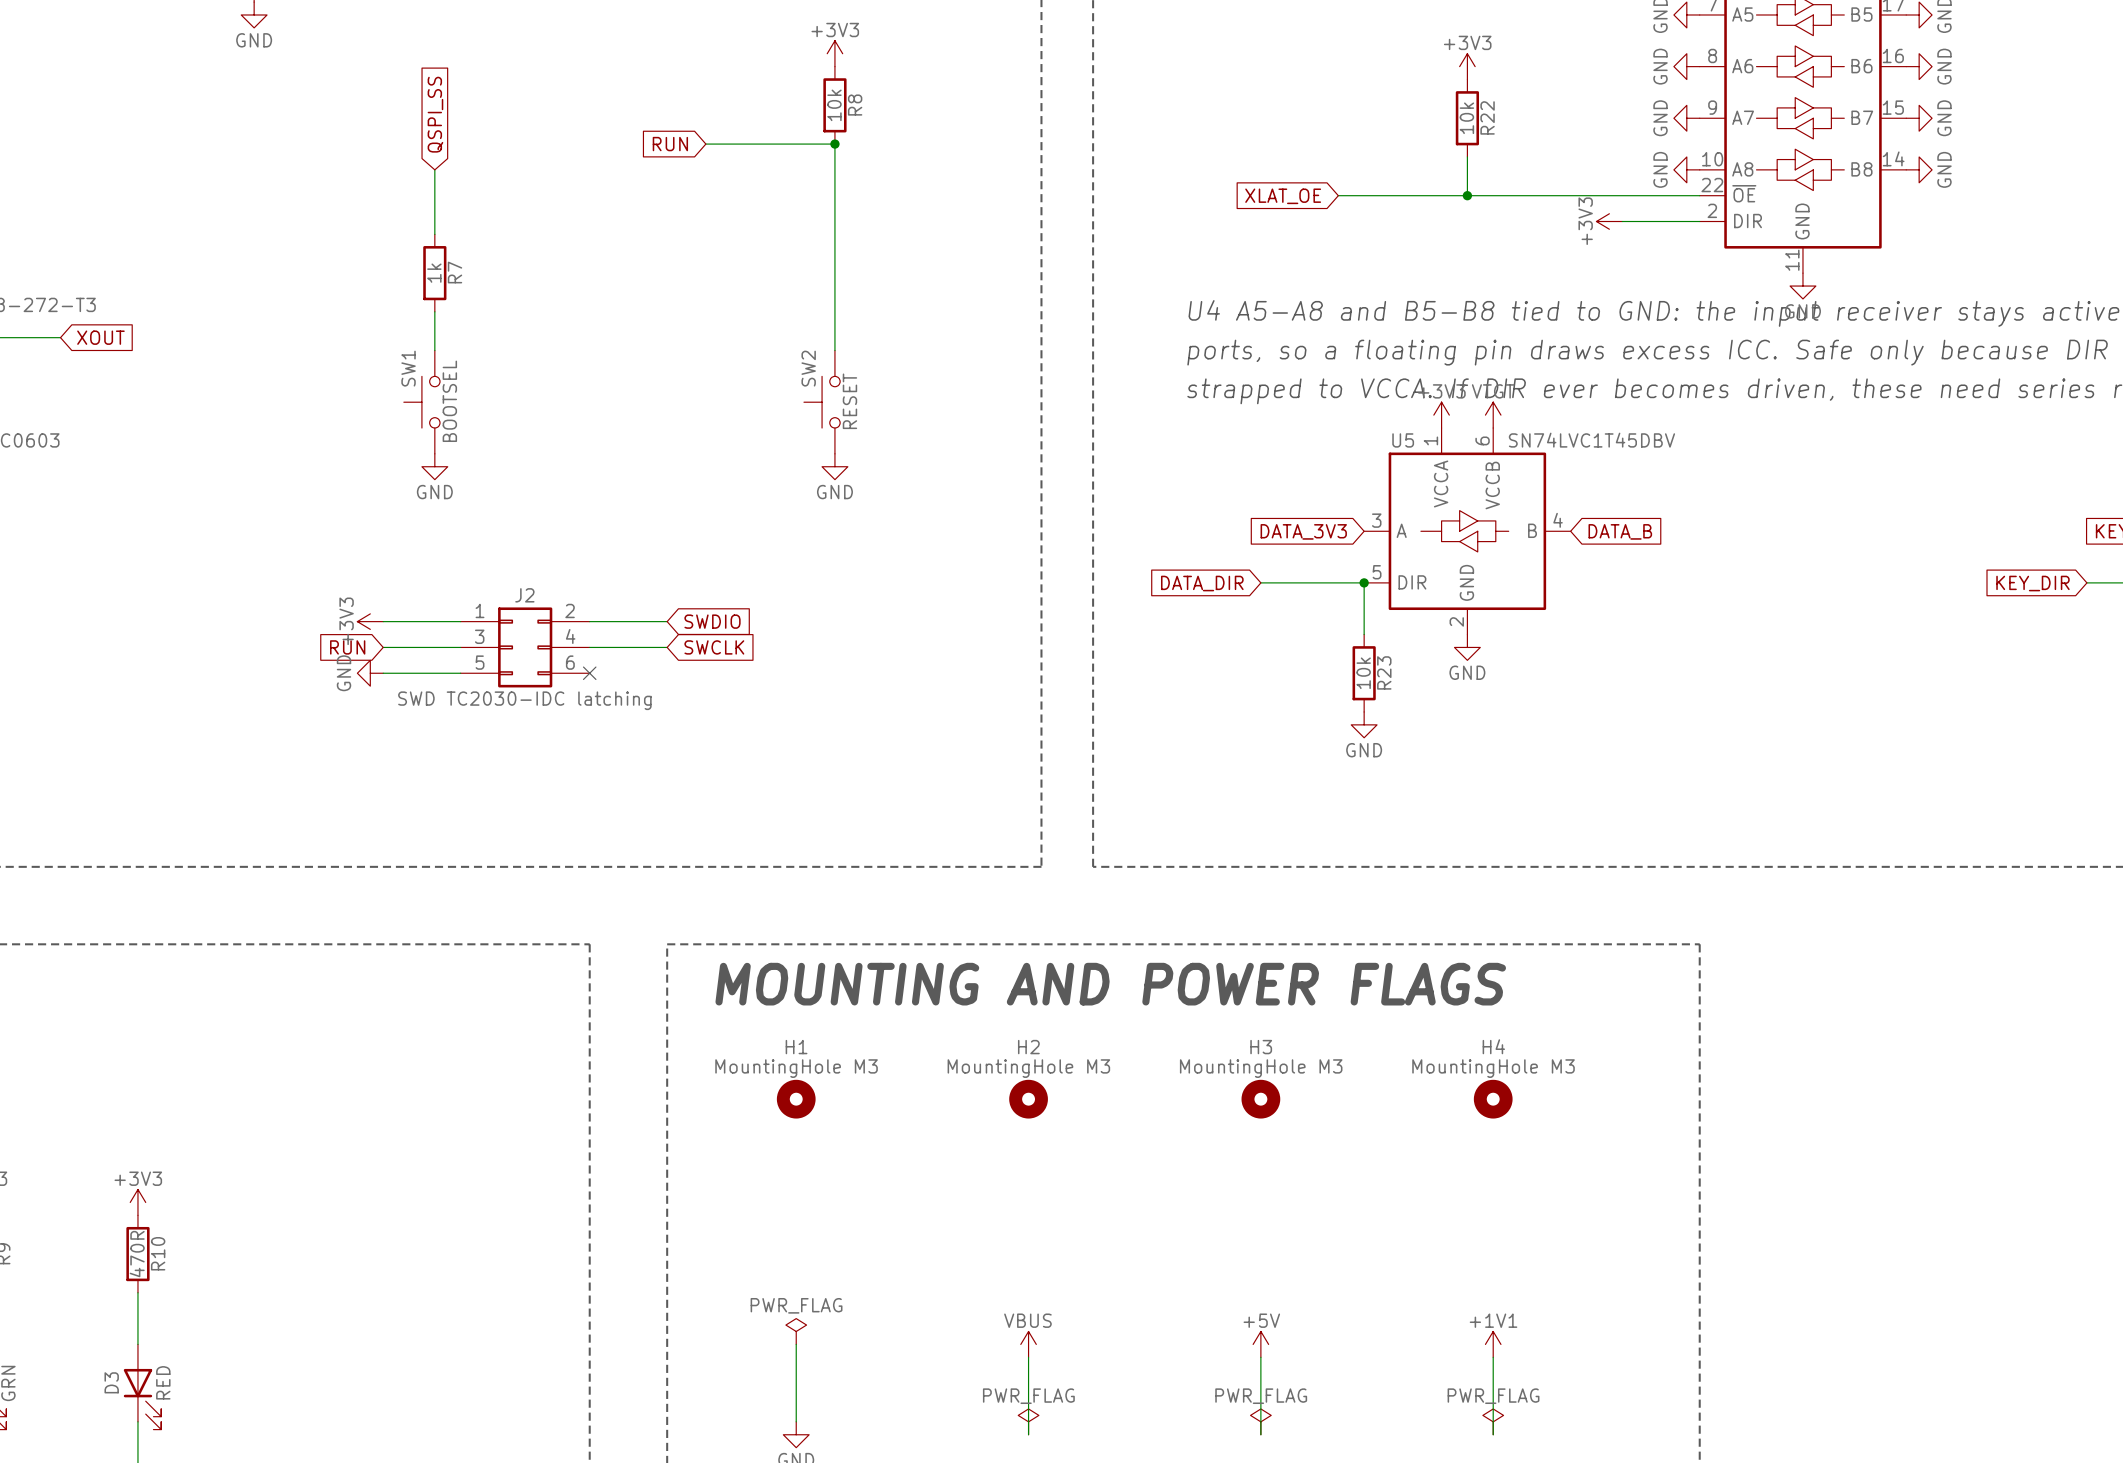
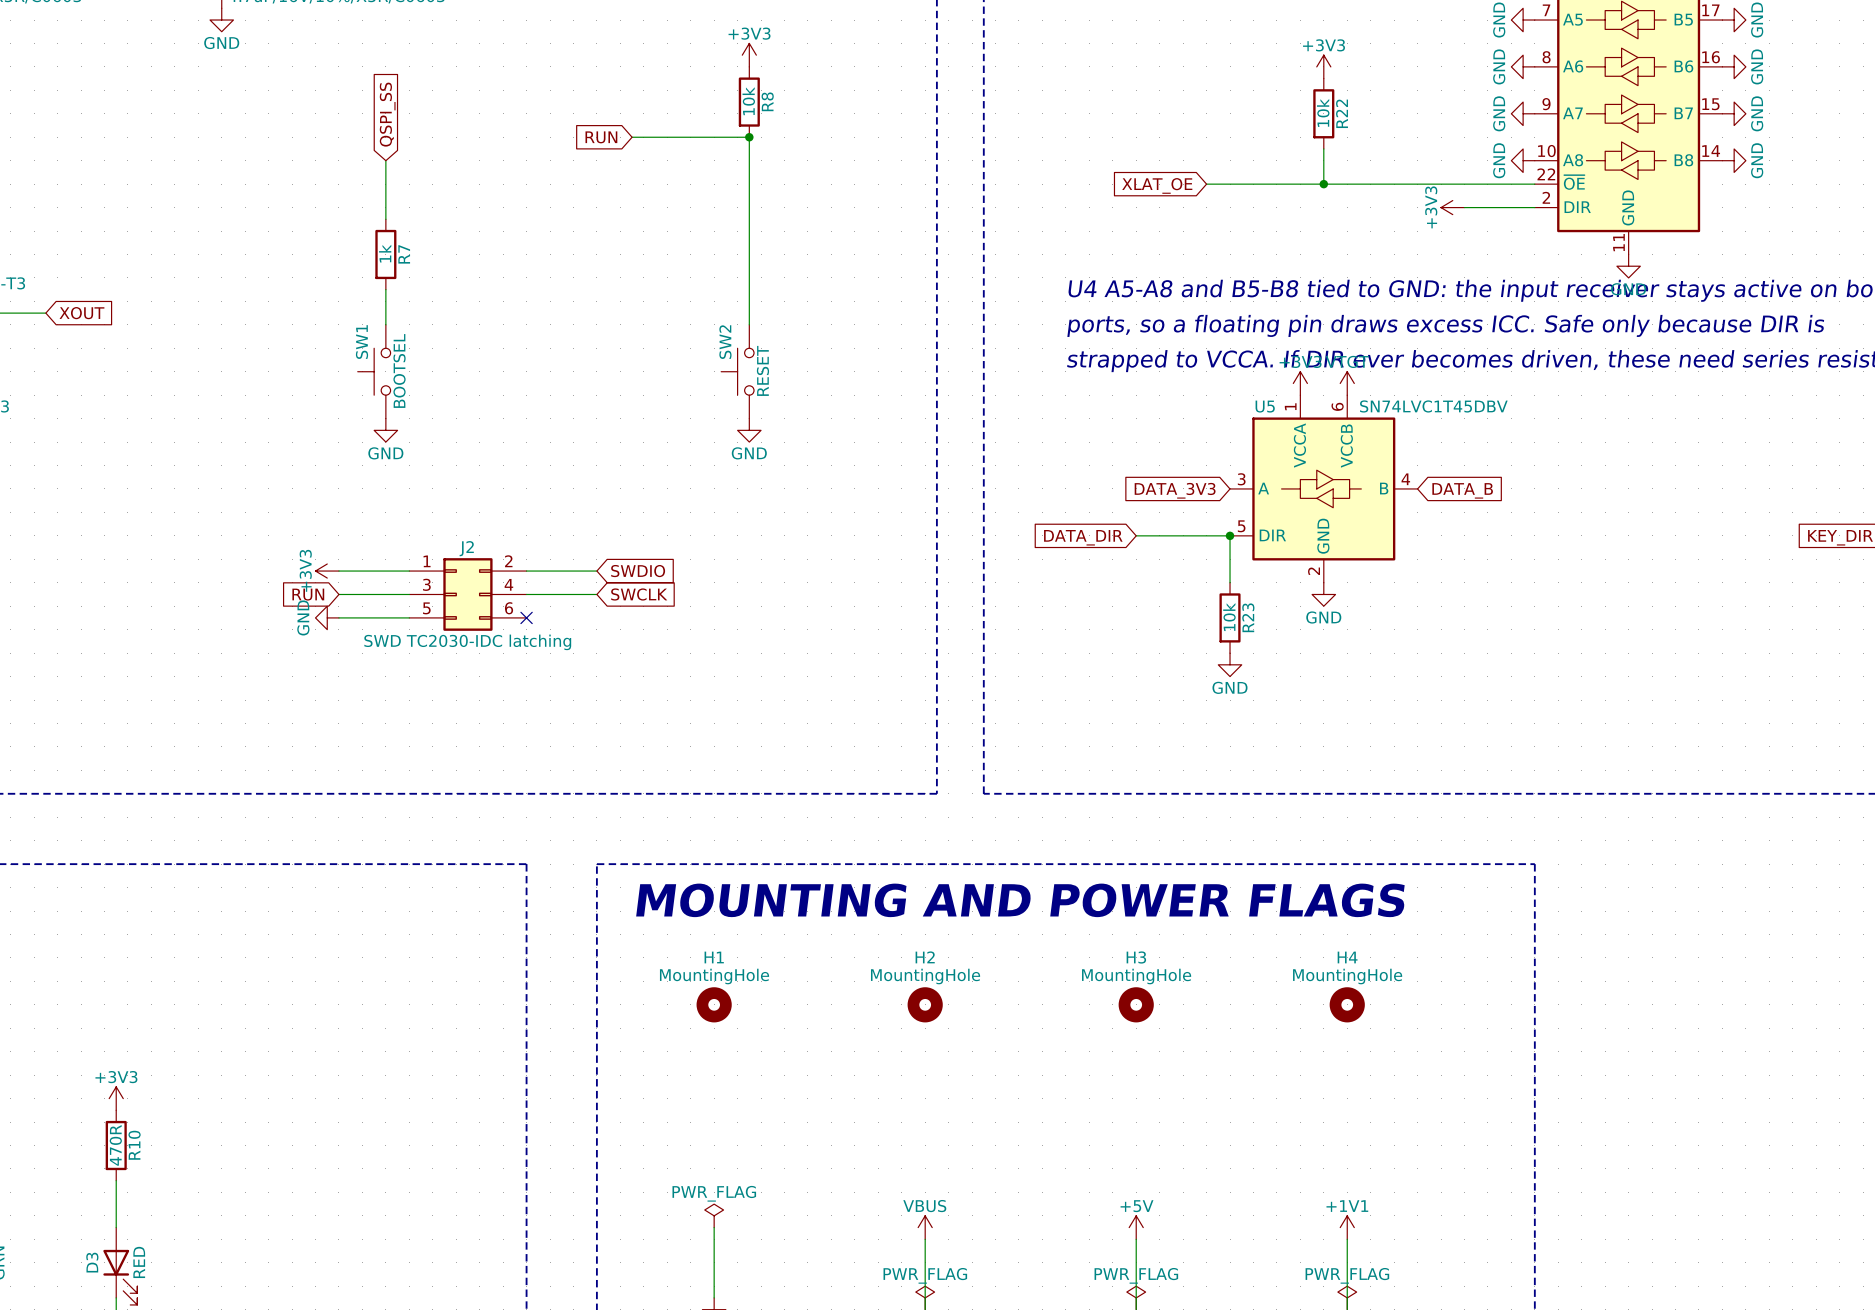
H1 value: MountingHole M3 (796, 1068) -> MountingHole (714, 976)
H2 value: MountingHole M3 (1028, 1068) -> MountingHole (925, 976)
H3 value: MountingHole M3 (1261, 1068) -> MountingHole (1136, 976)
H4 value: MountingHole M3 (1493, 1068) -> MountingHole (1347, 976)

